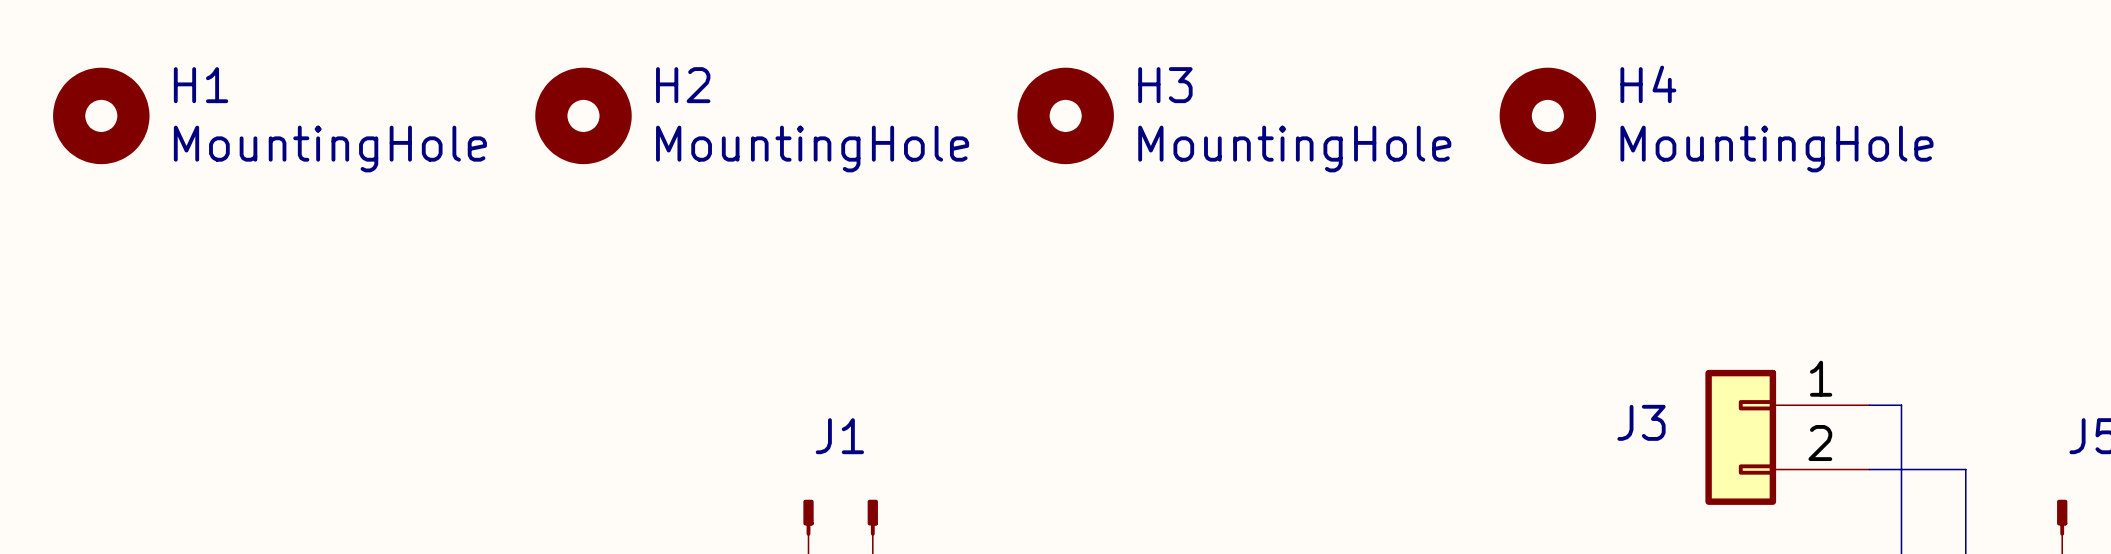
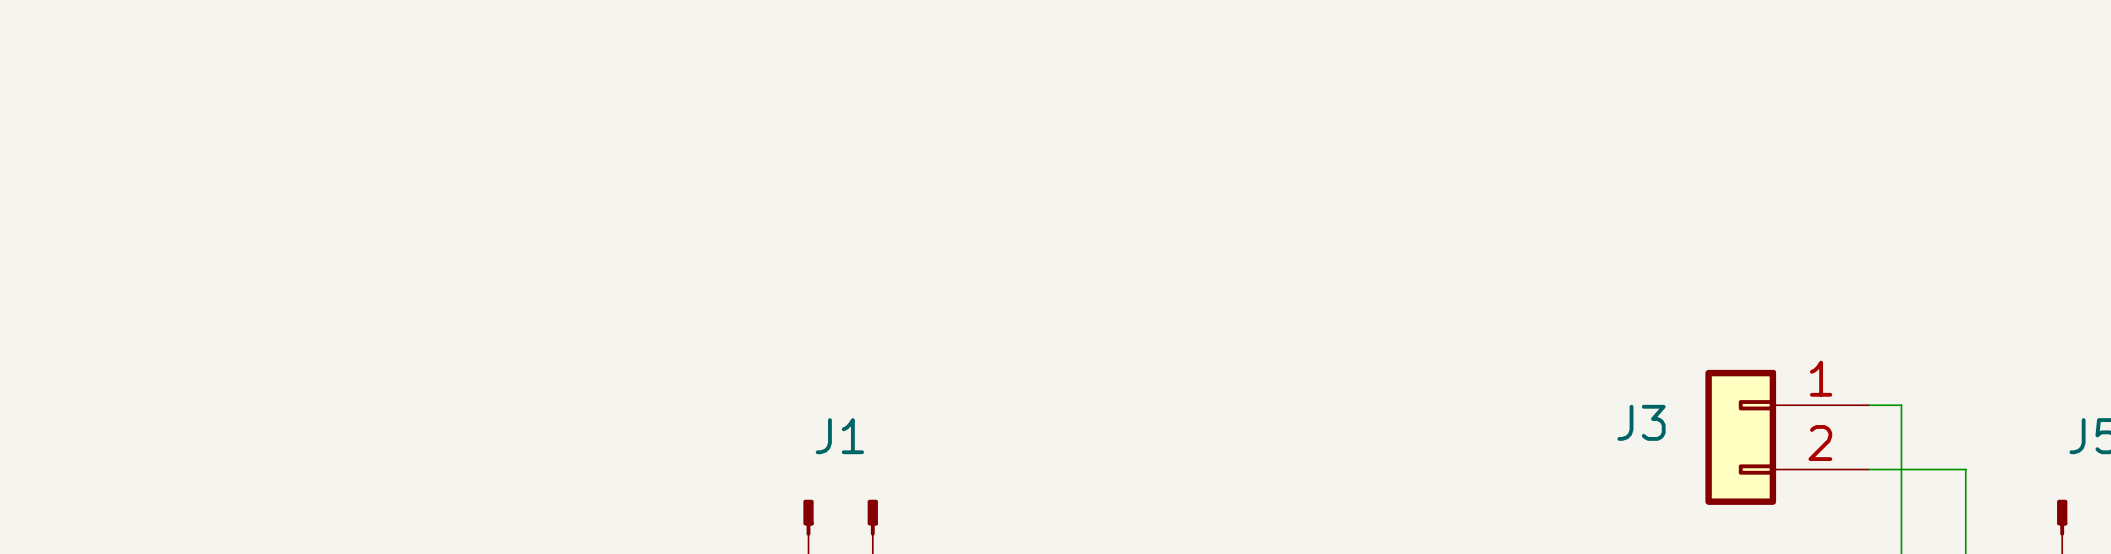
H1: MountingHole (101, 115) -> none
H2: MountingHole (583, 115) -> none
H3: MountingHole (1065, 115) -> none
H4: MountingHole (1547, 115) -> none

